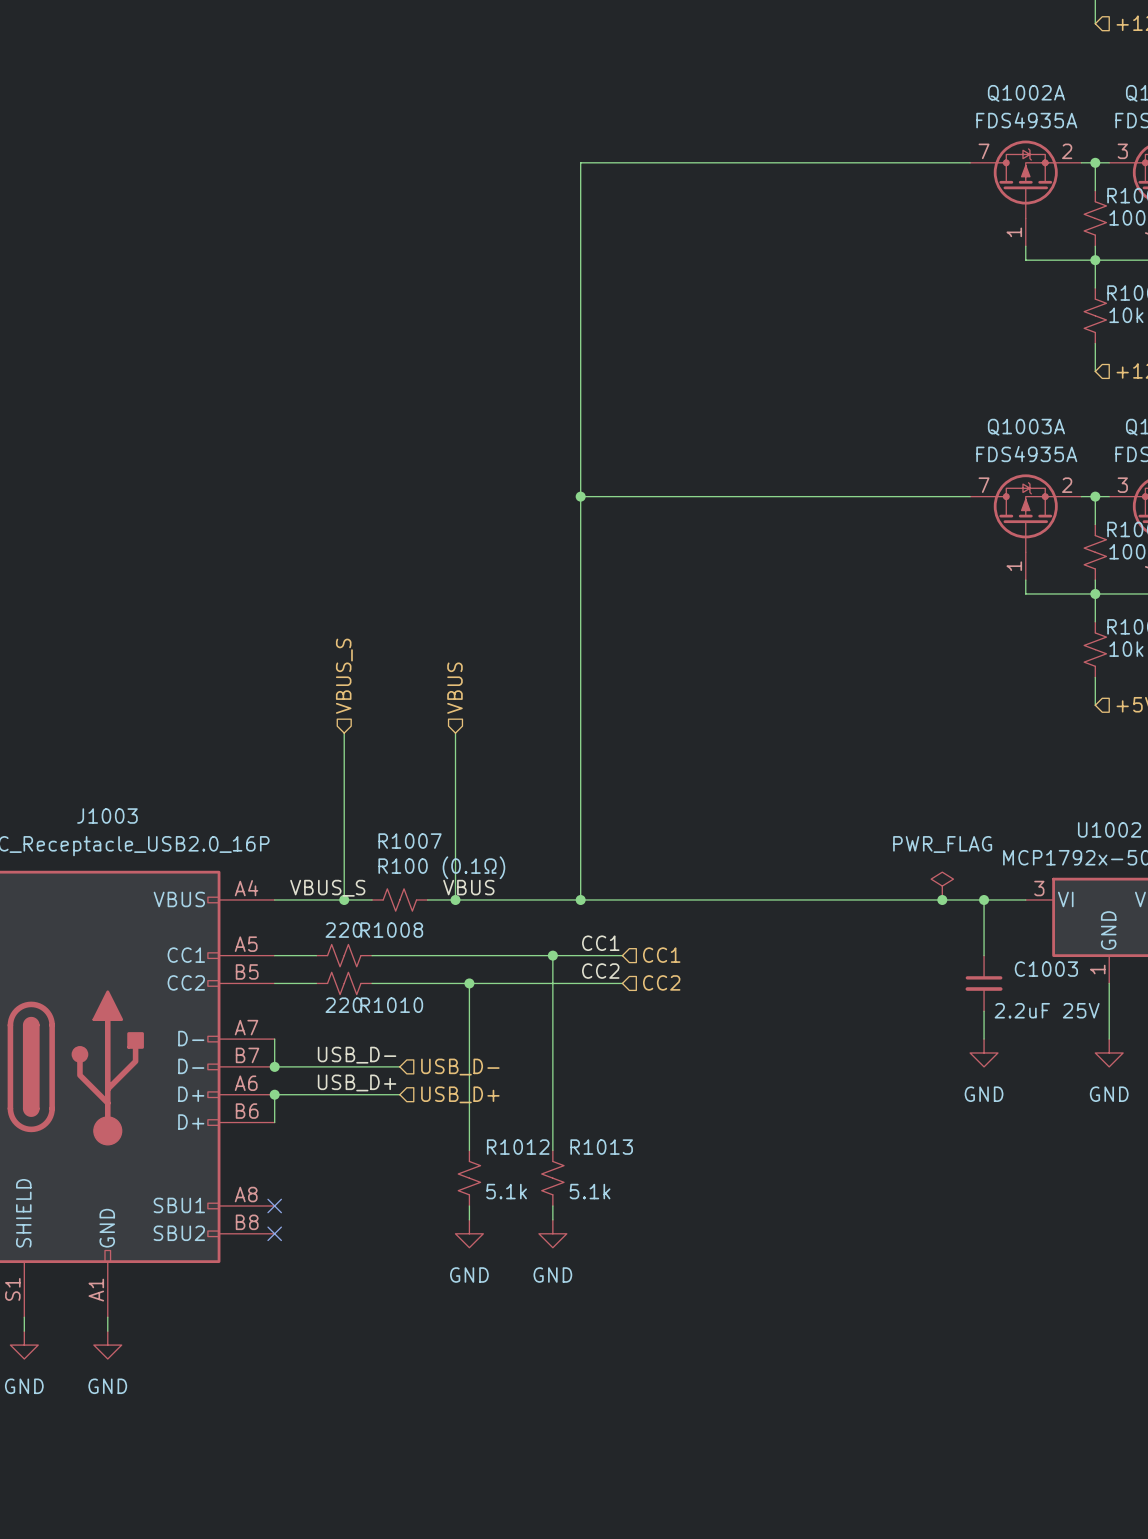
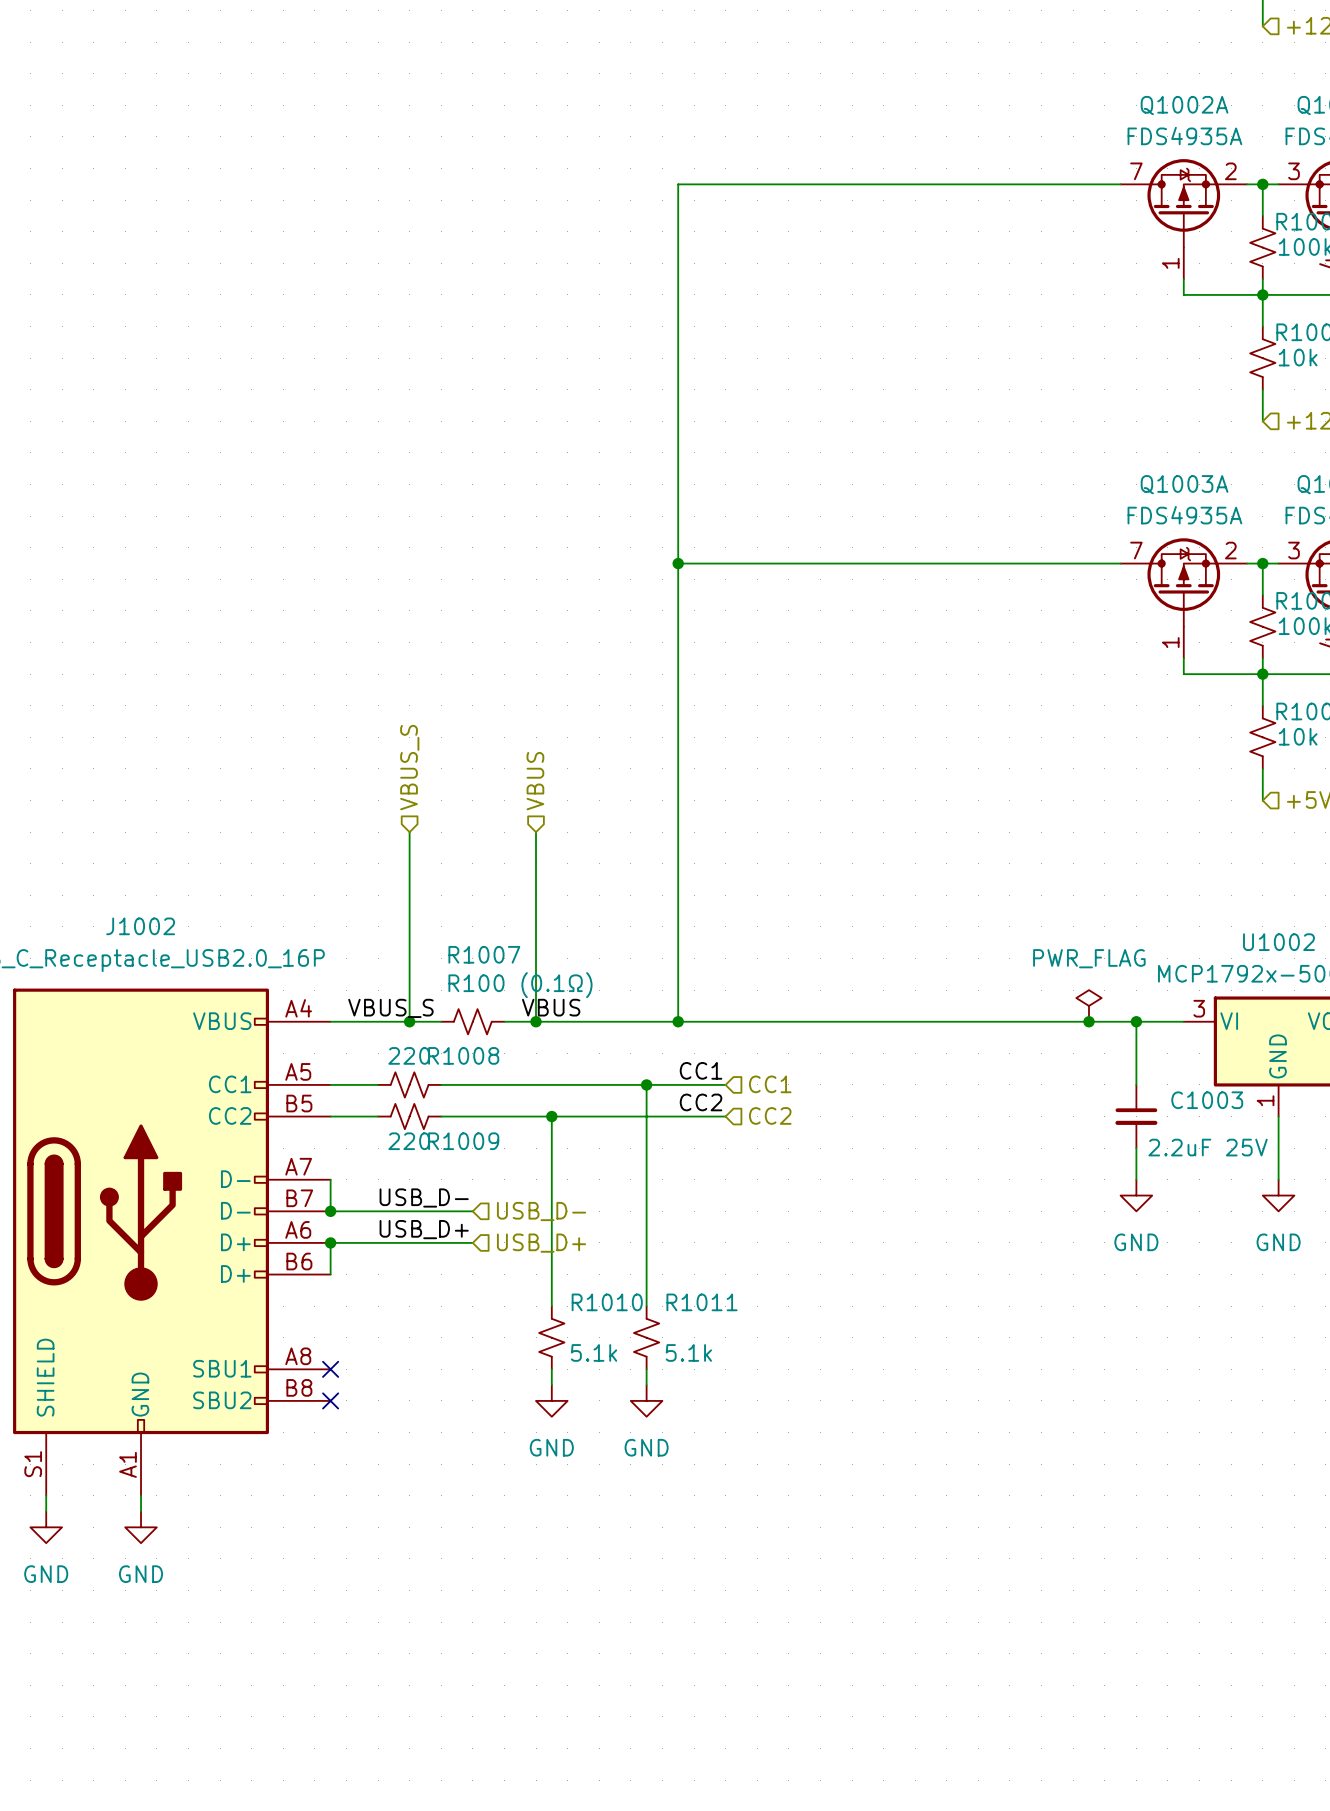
J1003 name: J1003 (107, 816) -> J1002 (140, 926)
R1010 name: R1010 (391, 1005) -> R1009 (463, 1141)
R1012 name: R1012 (518, 1147) -> R1010 (607, 1302)
R1013 name: R1013 (601, 1147) -> R1011 (702, 1302)

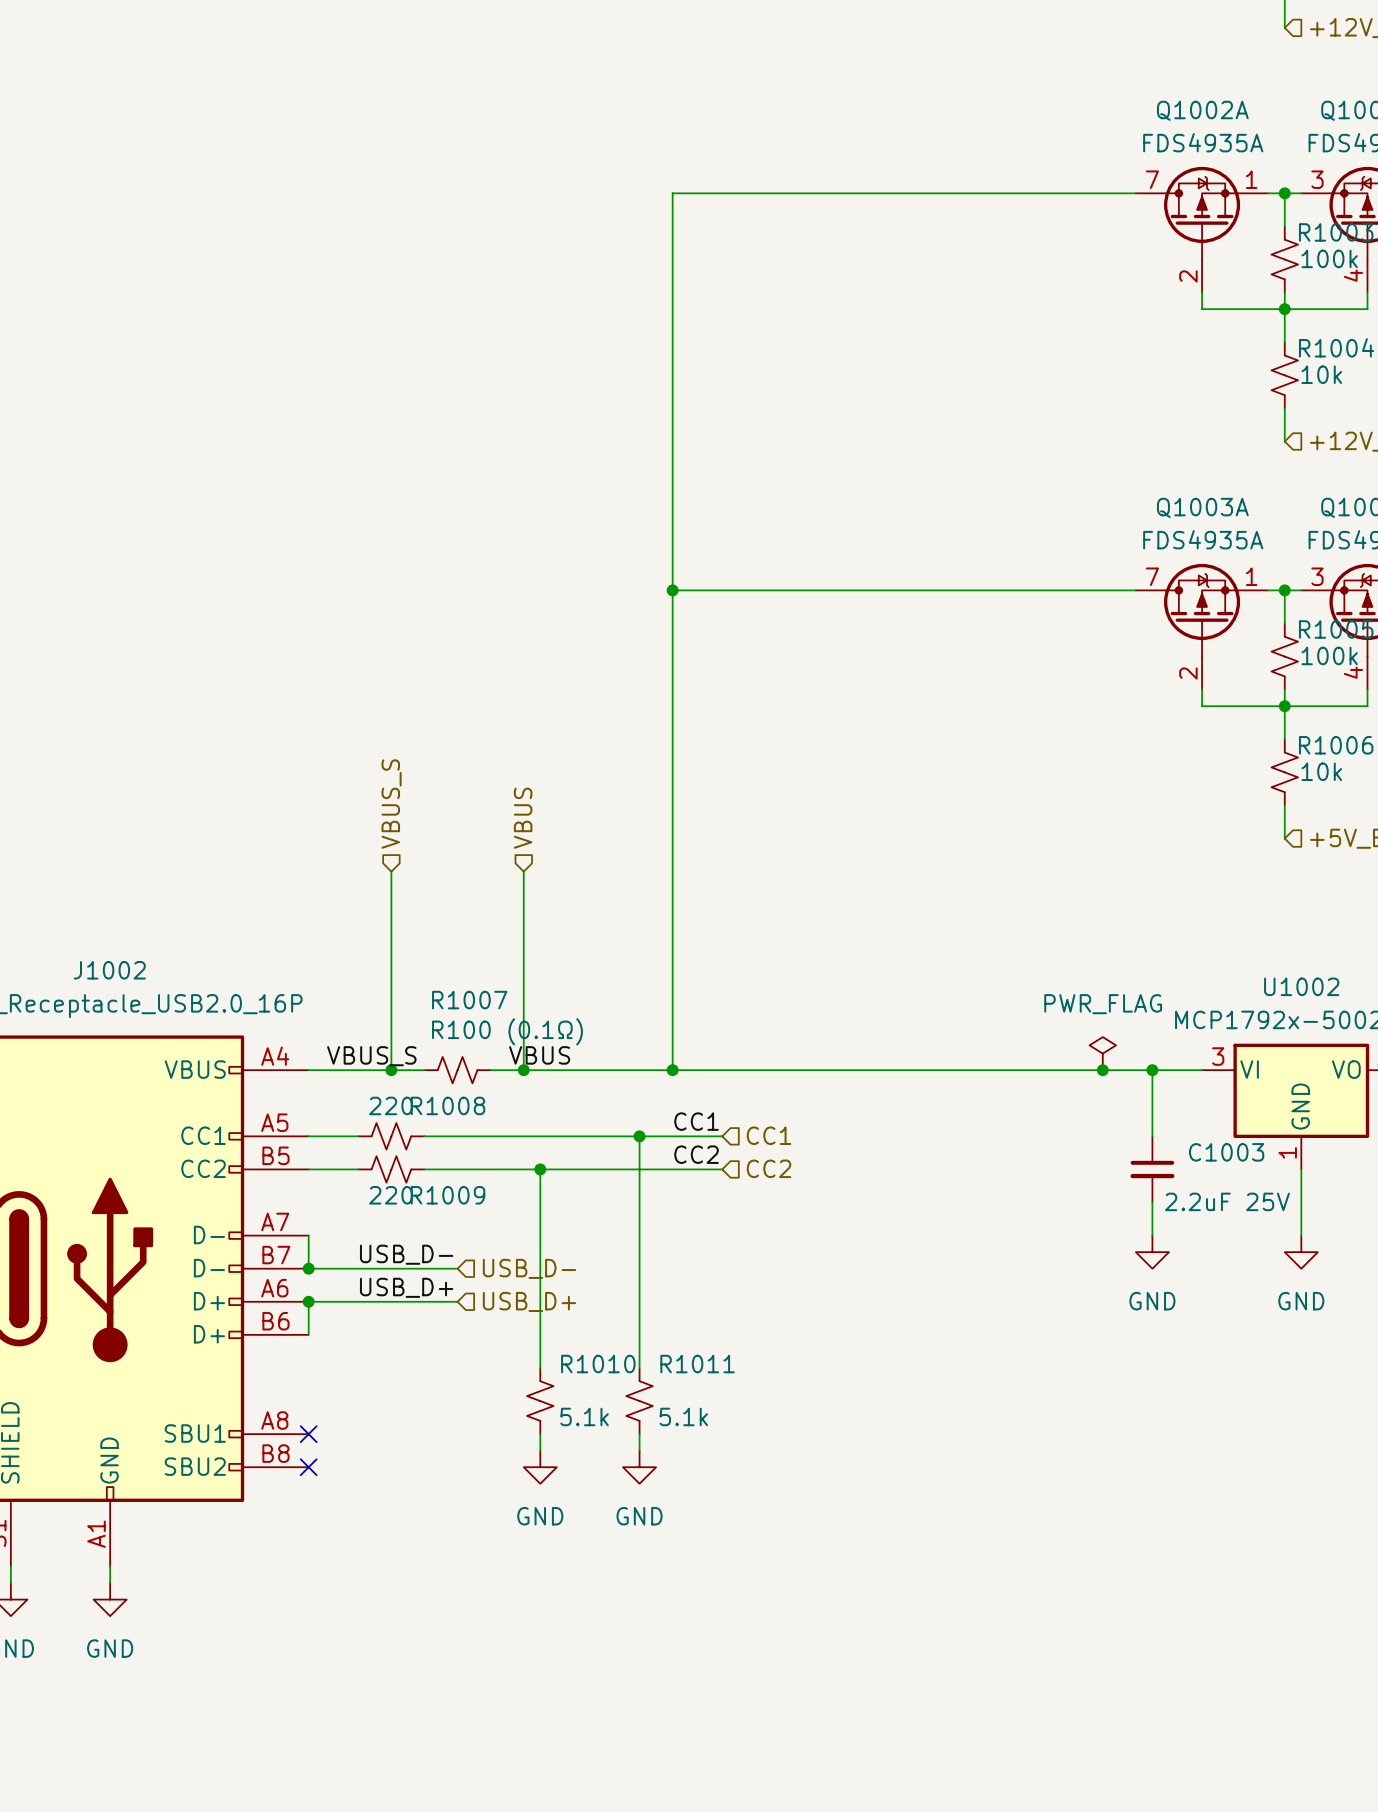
Q1002A pin number: 2 (1230, 171) -> 1 (1251, 179)
Q1002A pin number: 1 (1170, 263) -> 2 (1188, 276)
Q1003A pin number: 2 (1230, 550) -> 1 (1251, 576)
Q1003A pin number: 1 (1170, 642) -> 2 (1188, 673)

